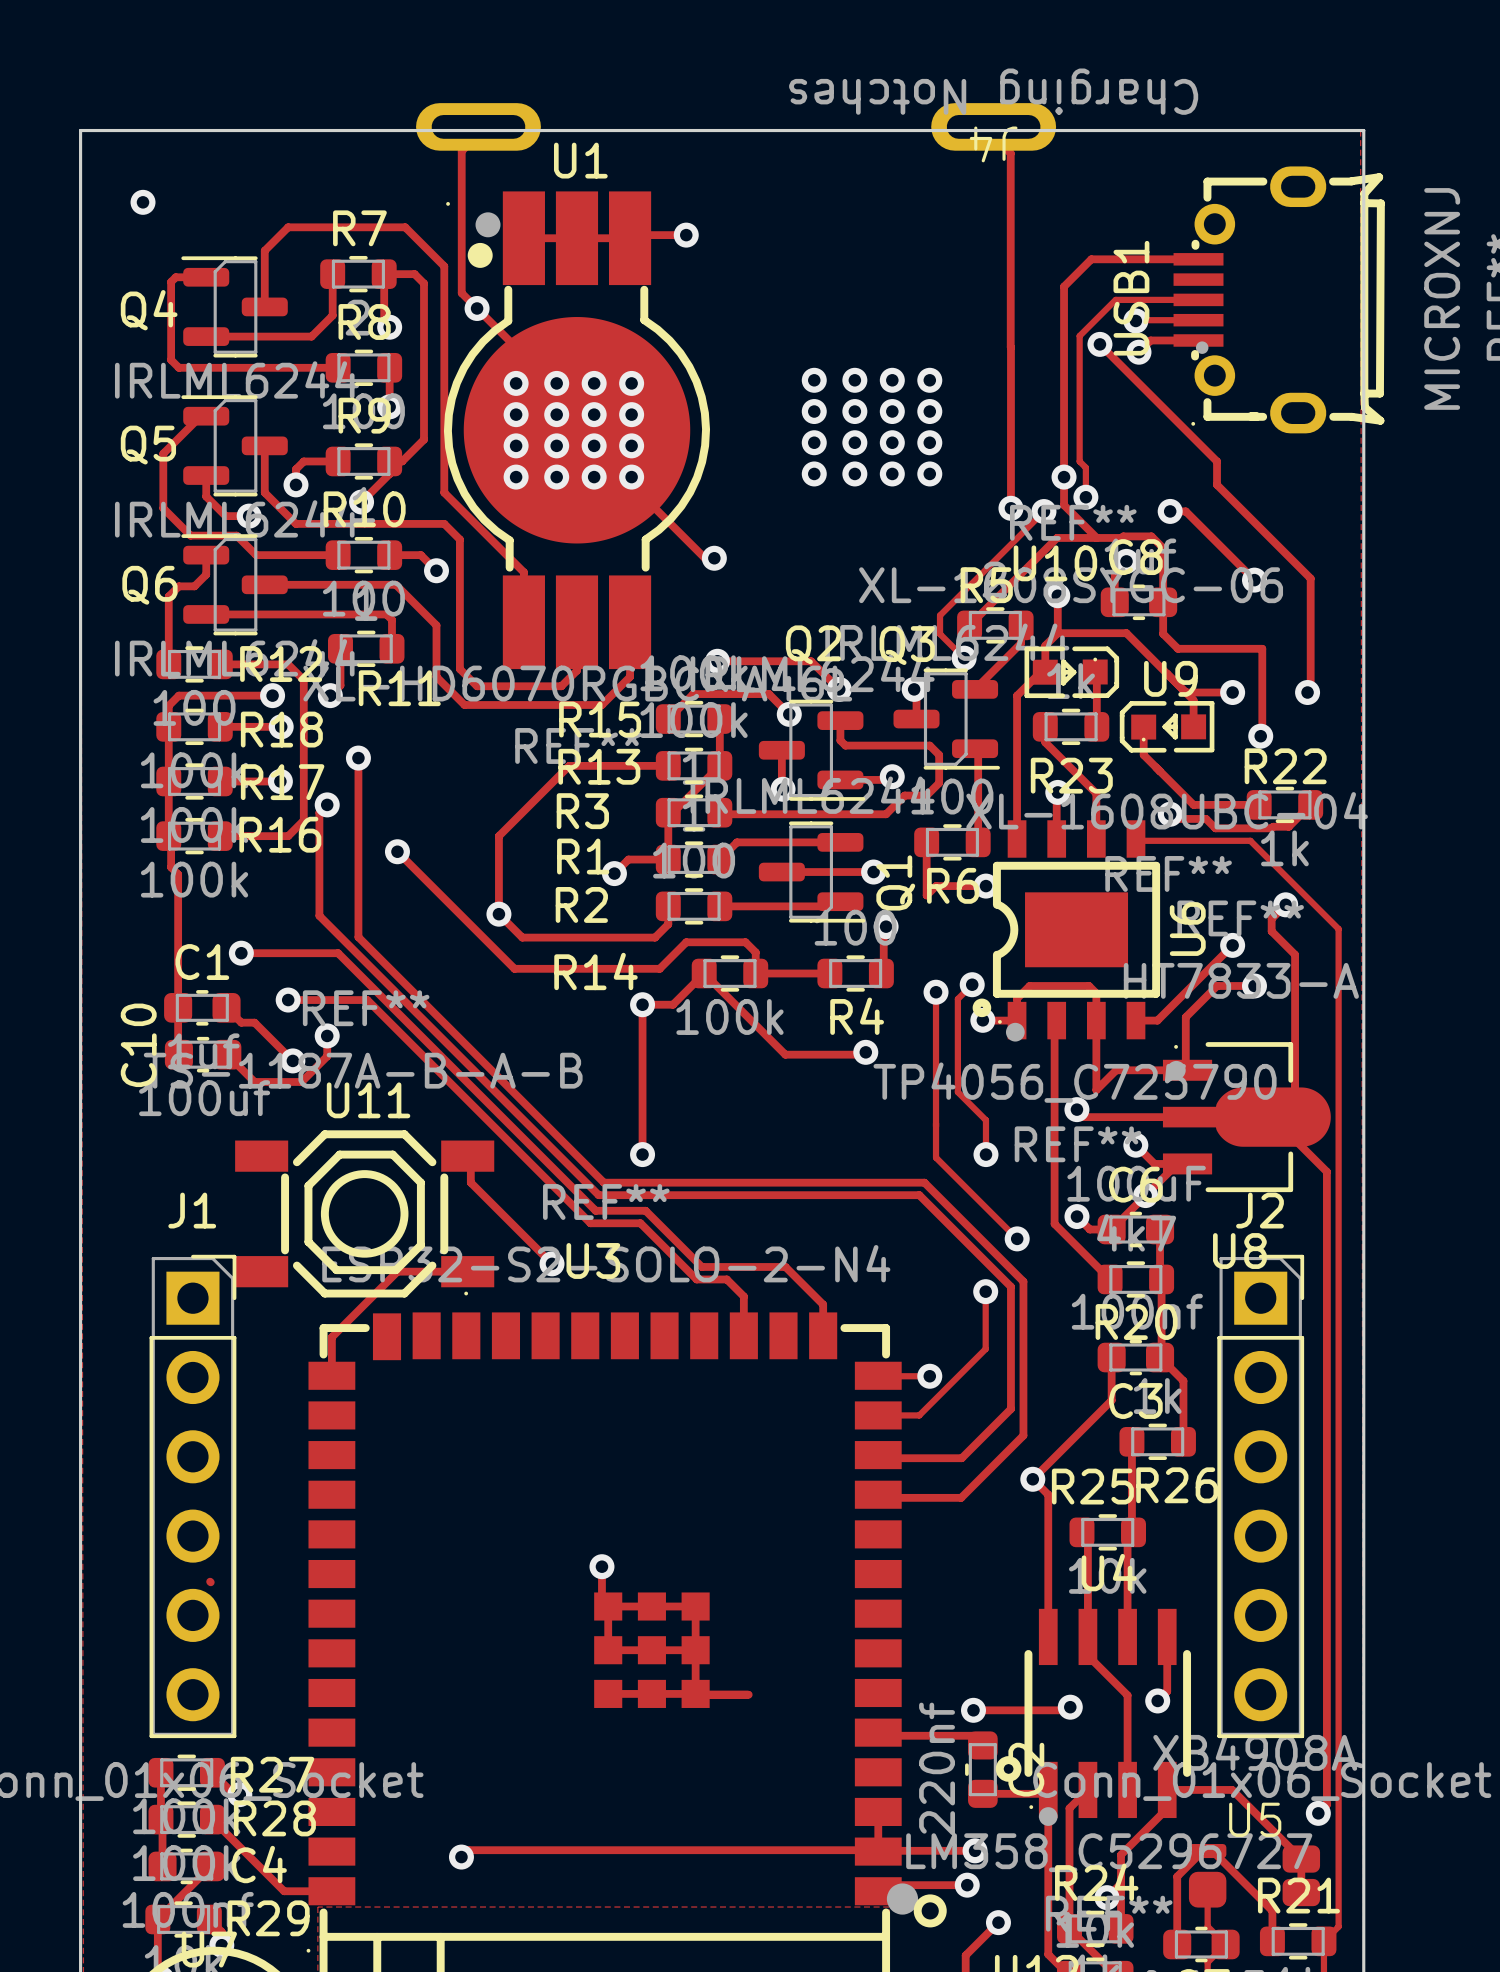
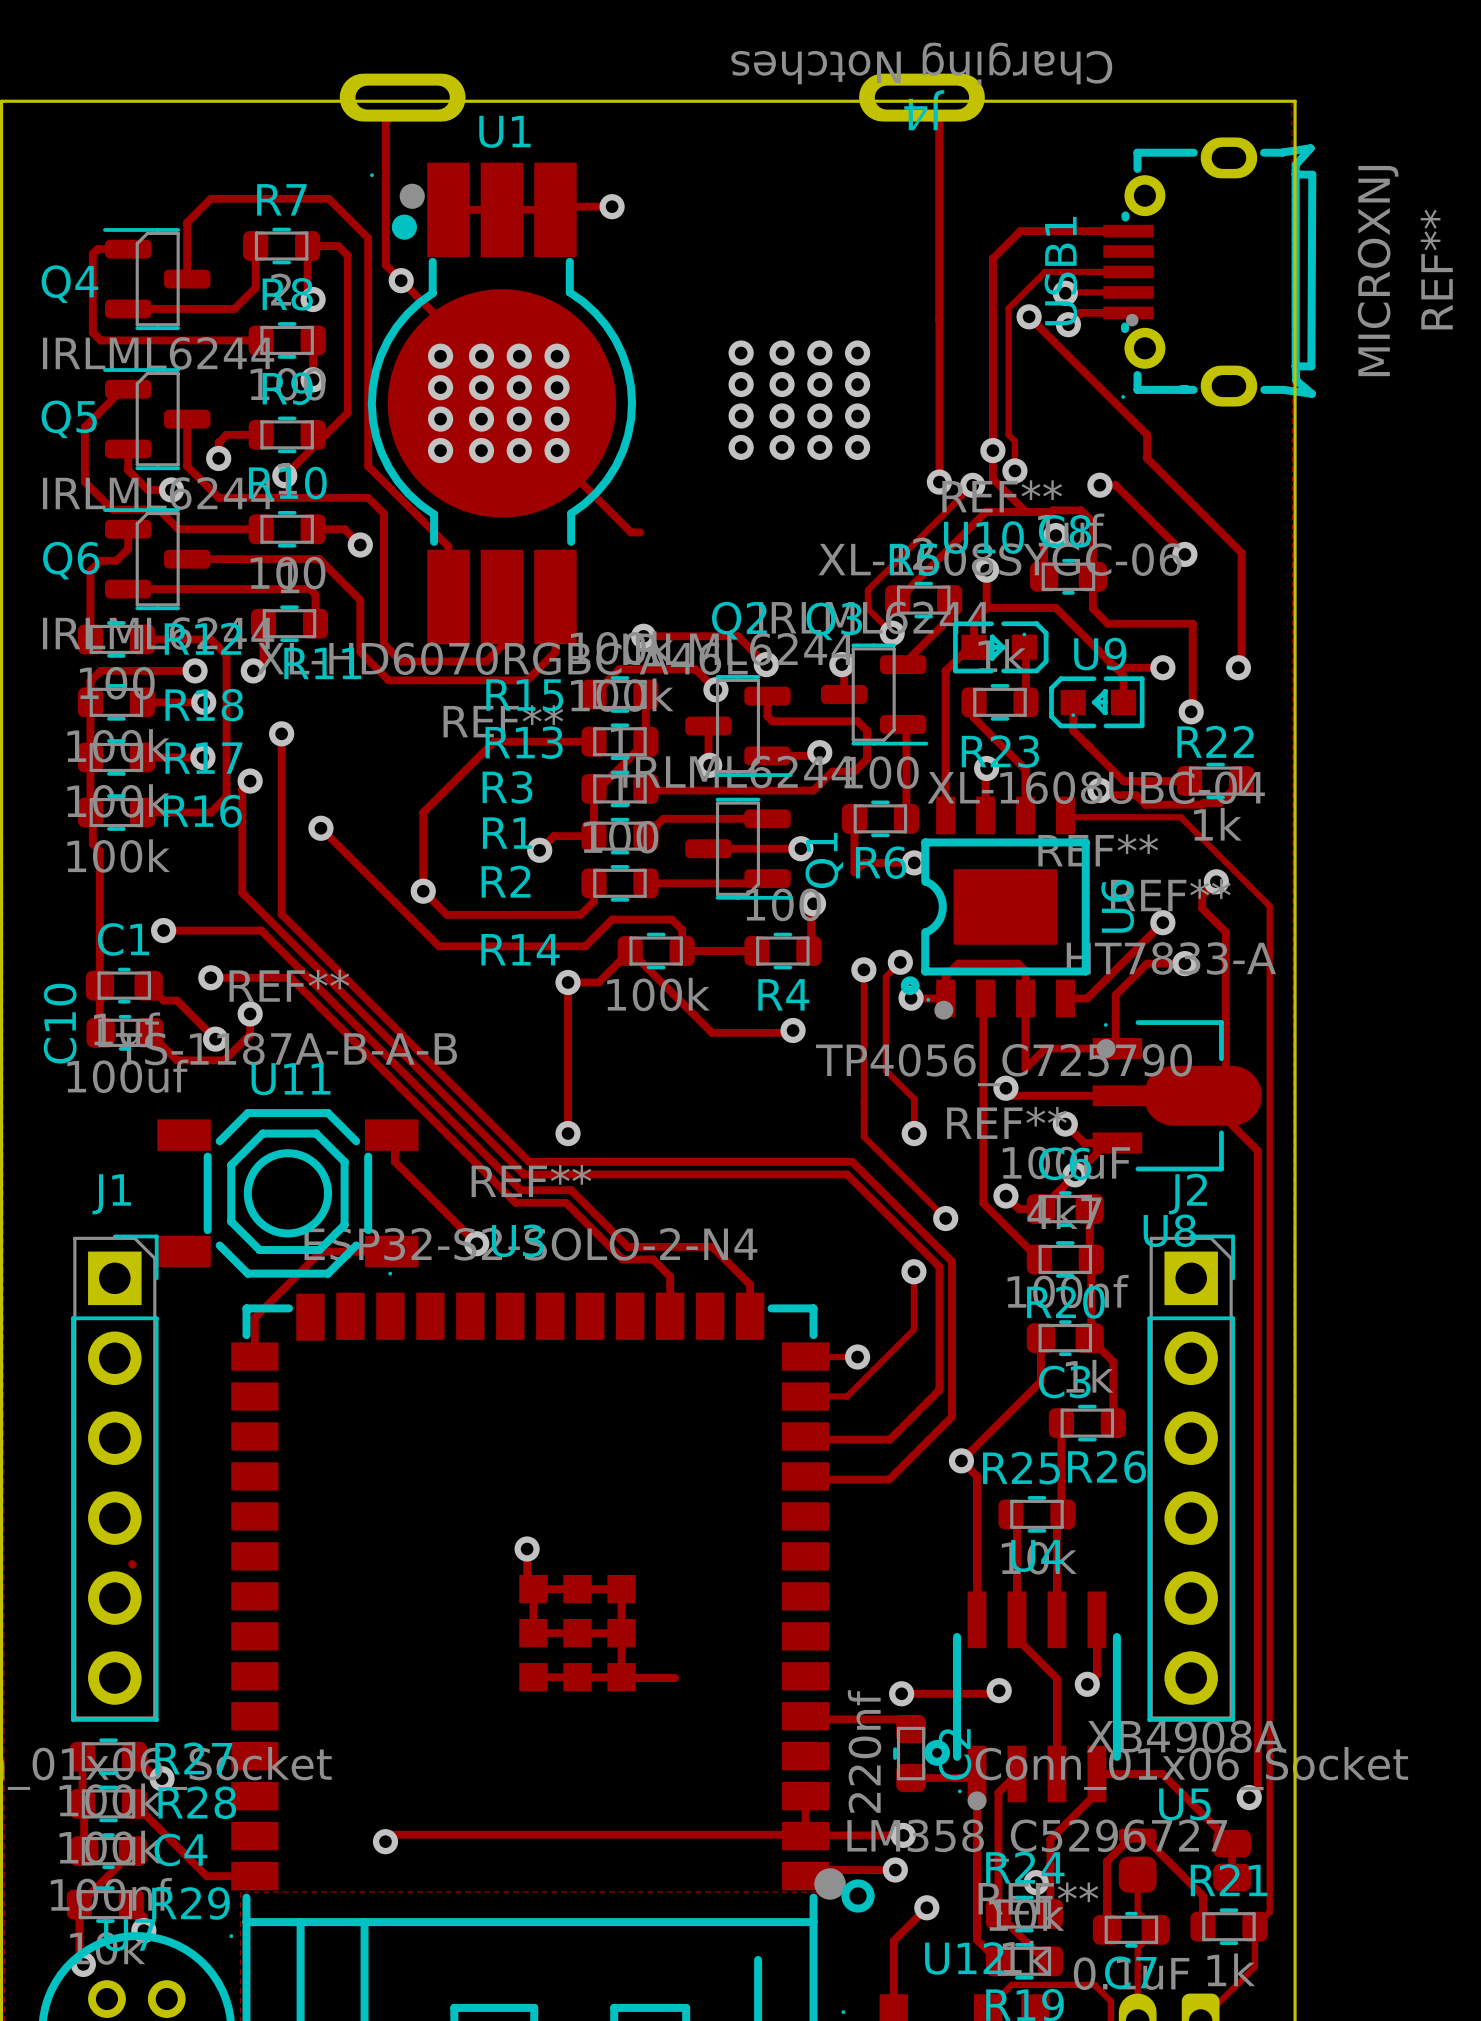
via: (143, 202) -> none
via: (714, 558) -> none

